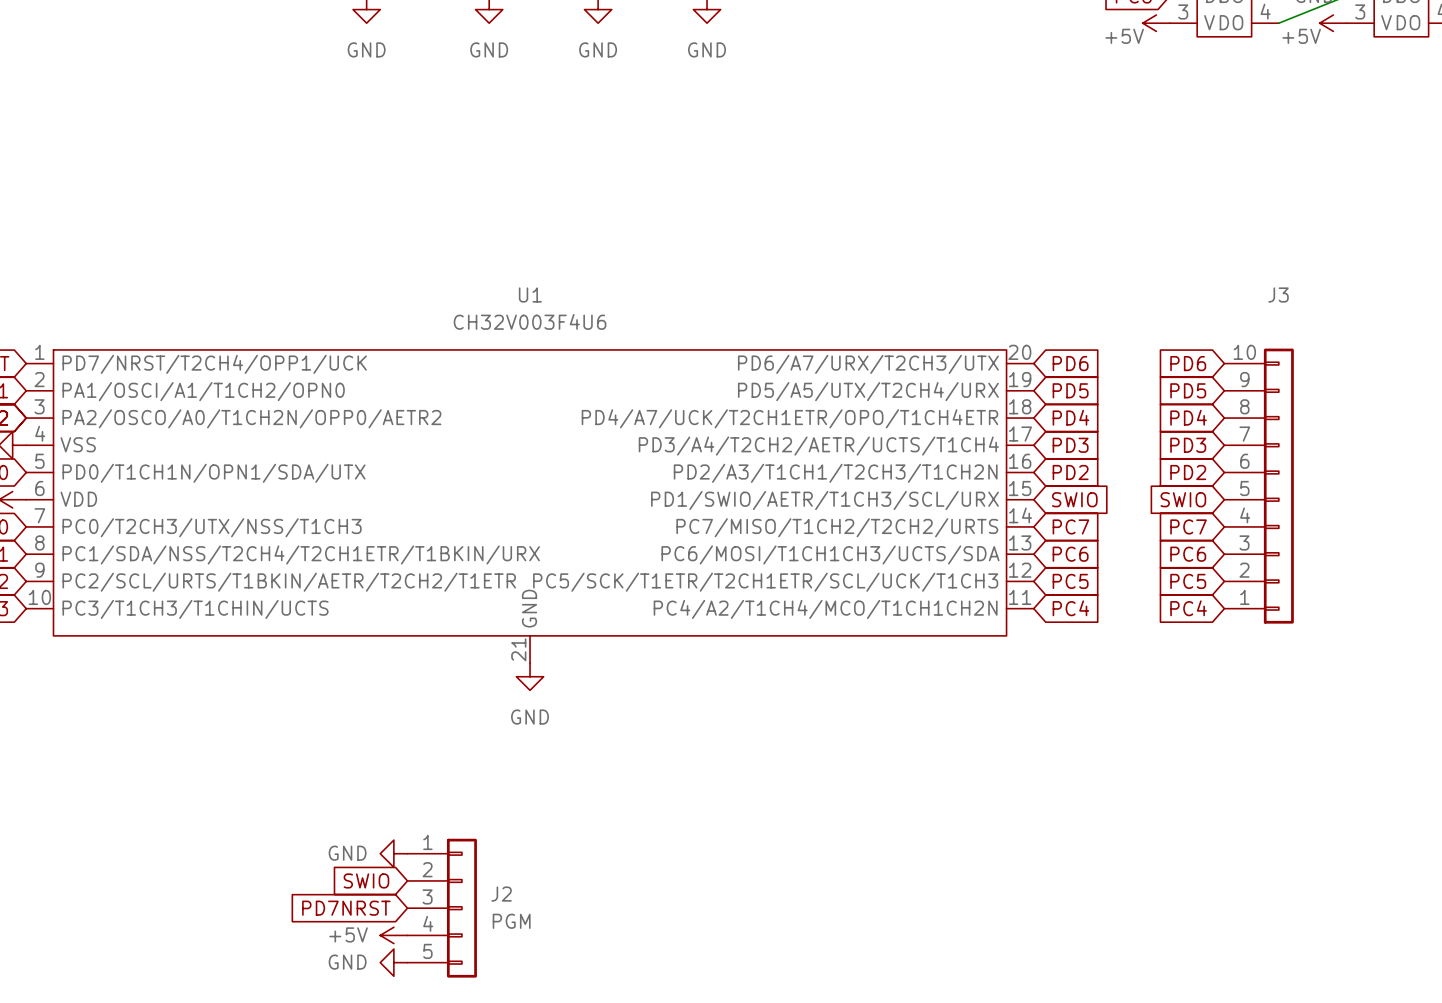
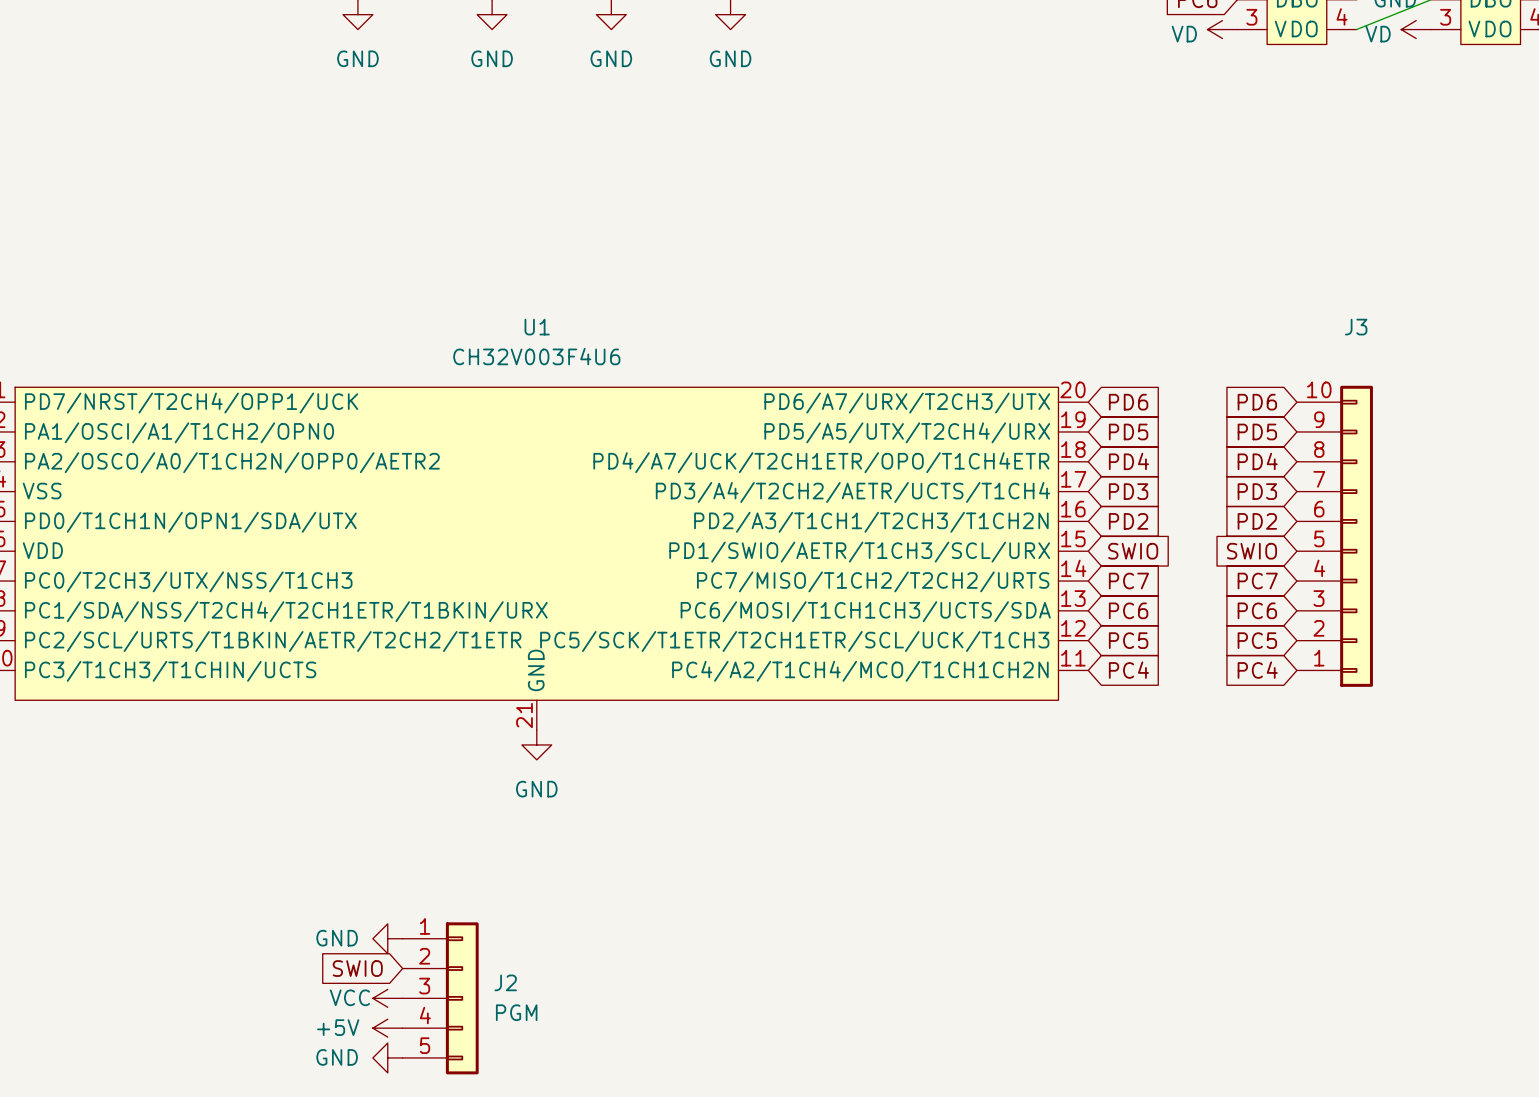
power symbol: +5V (1156, 23) -> VD (1222, 29)
power symbol: +5V (1333, 23) -> VD (1416, 29)
global label: PD7NRST (346, 908) -> none
power symbol: none -> VCC (387, 998)

